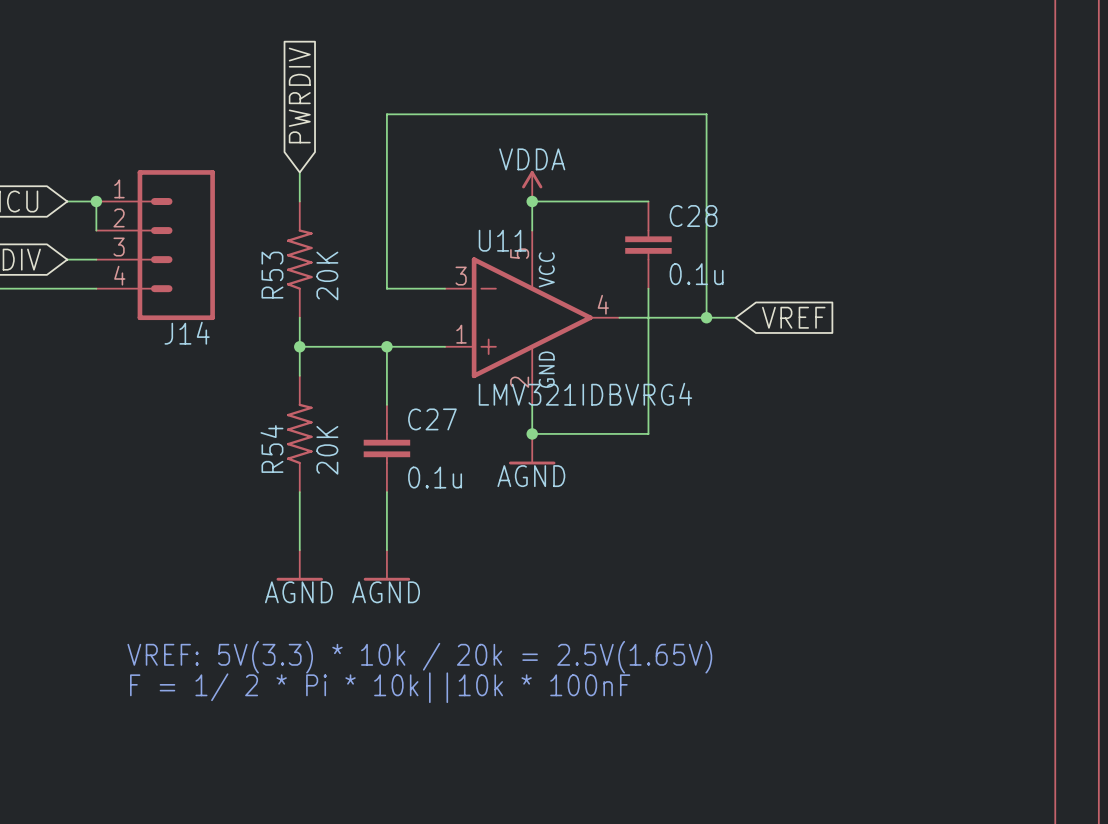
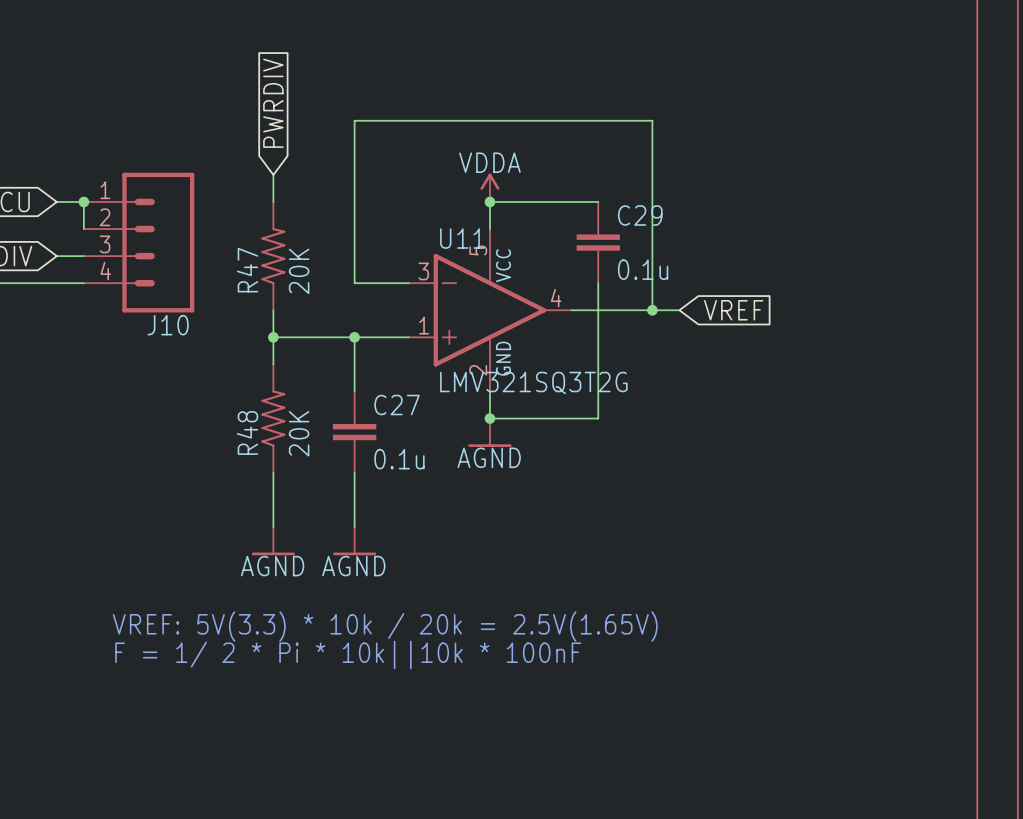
C28 name: C28 (693, 216) -> C29 (640, 215)
R53 name: R53 (272, 275) -> R47 (247, 270)
J14 name: J14 (187, 333) -> J10 (168, 325)
U11 value: LMV321IDBVRG4 (585, 394) -> LMV321SQ3T2G (533, 382)
R54 name: R54 (271, 449) -> R48 (247, 432)

